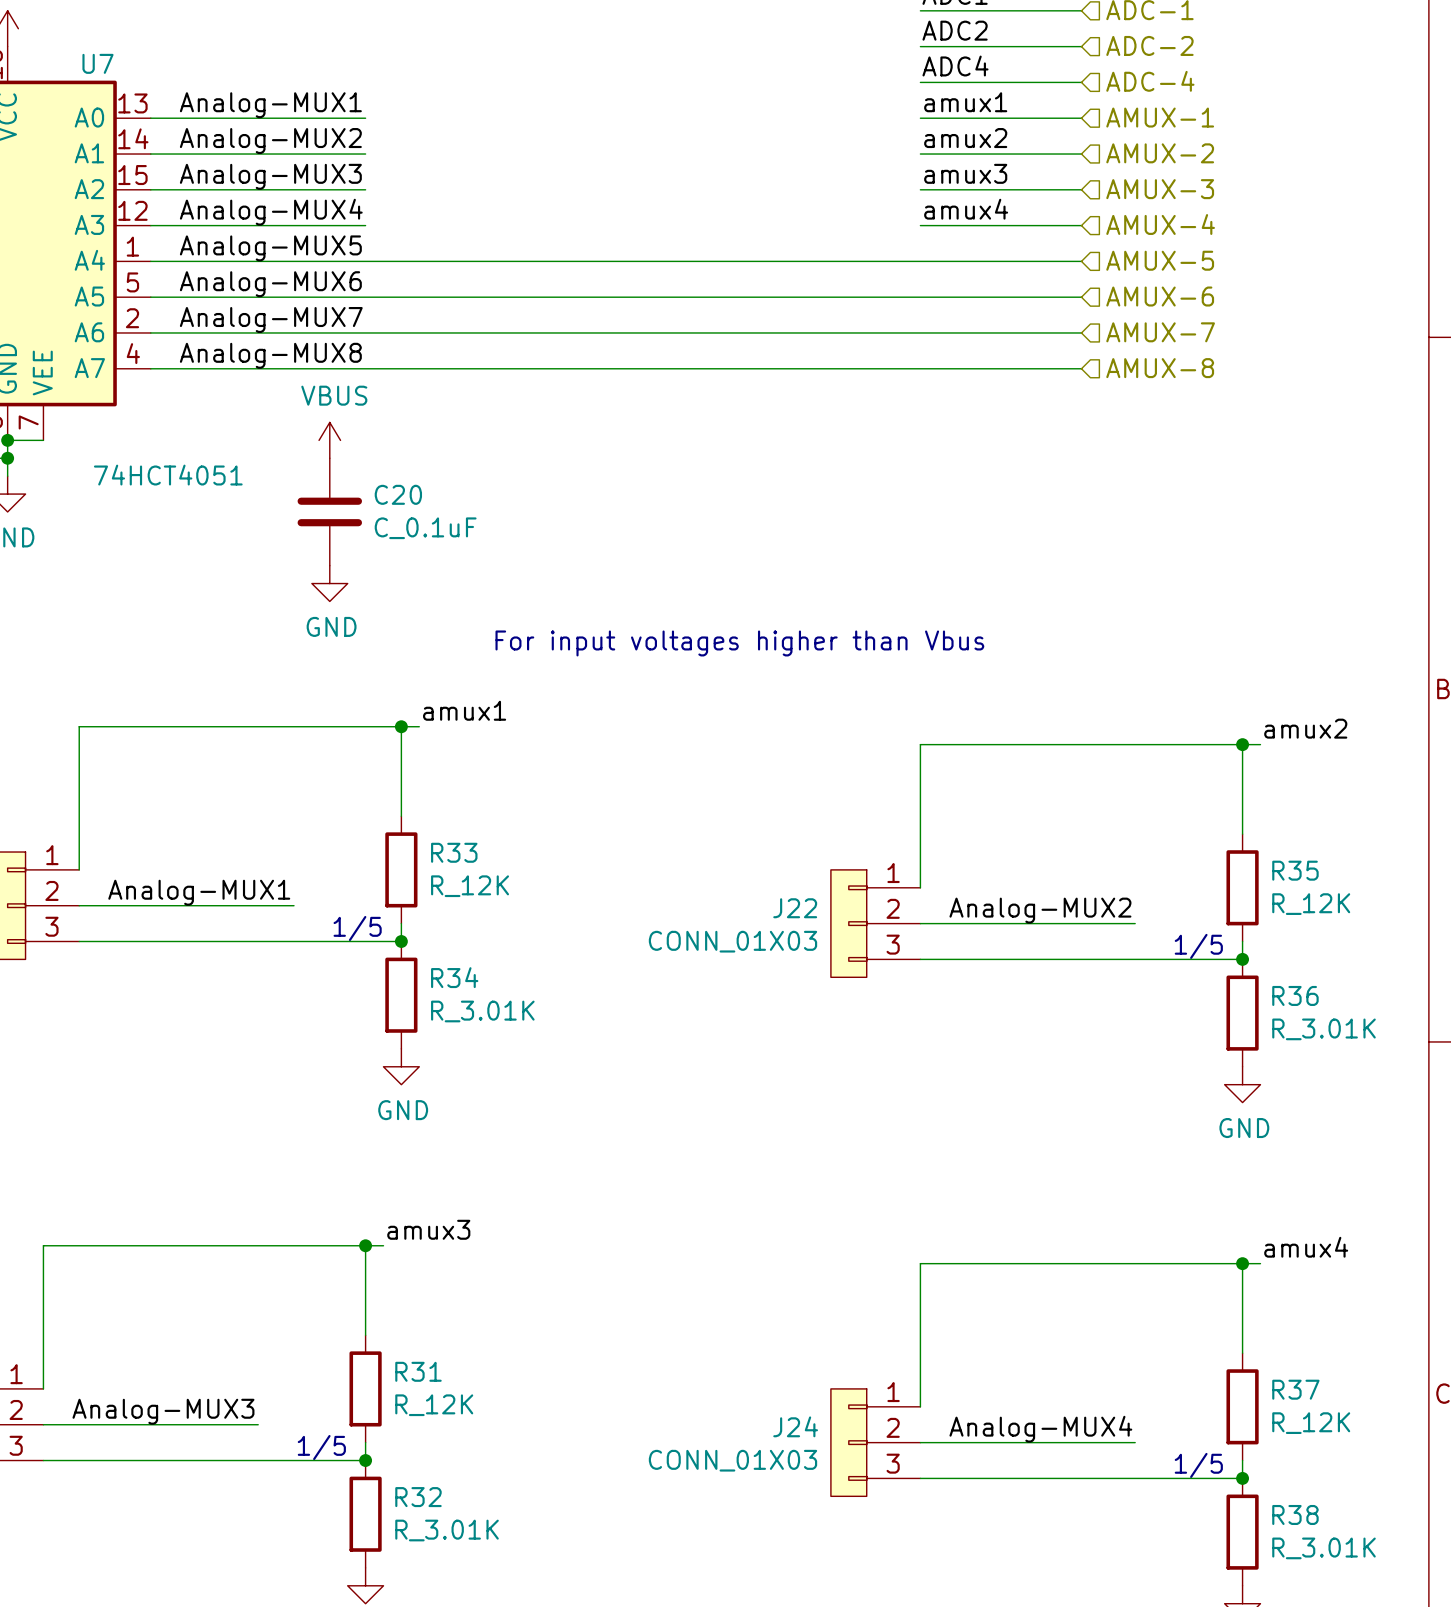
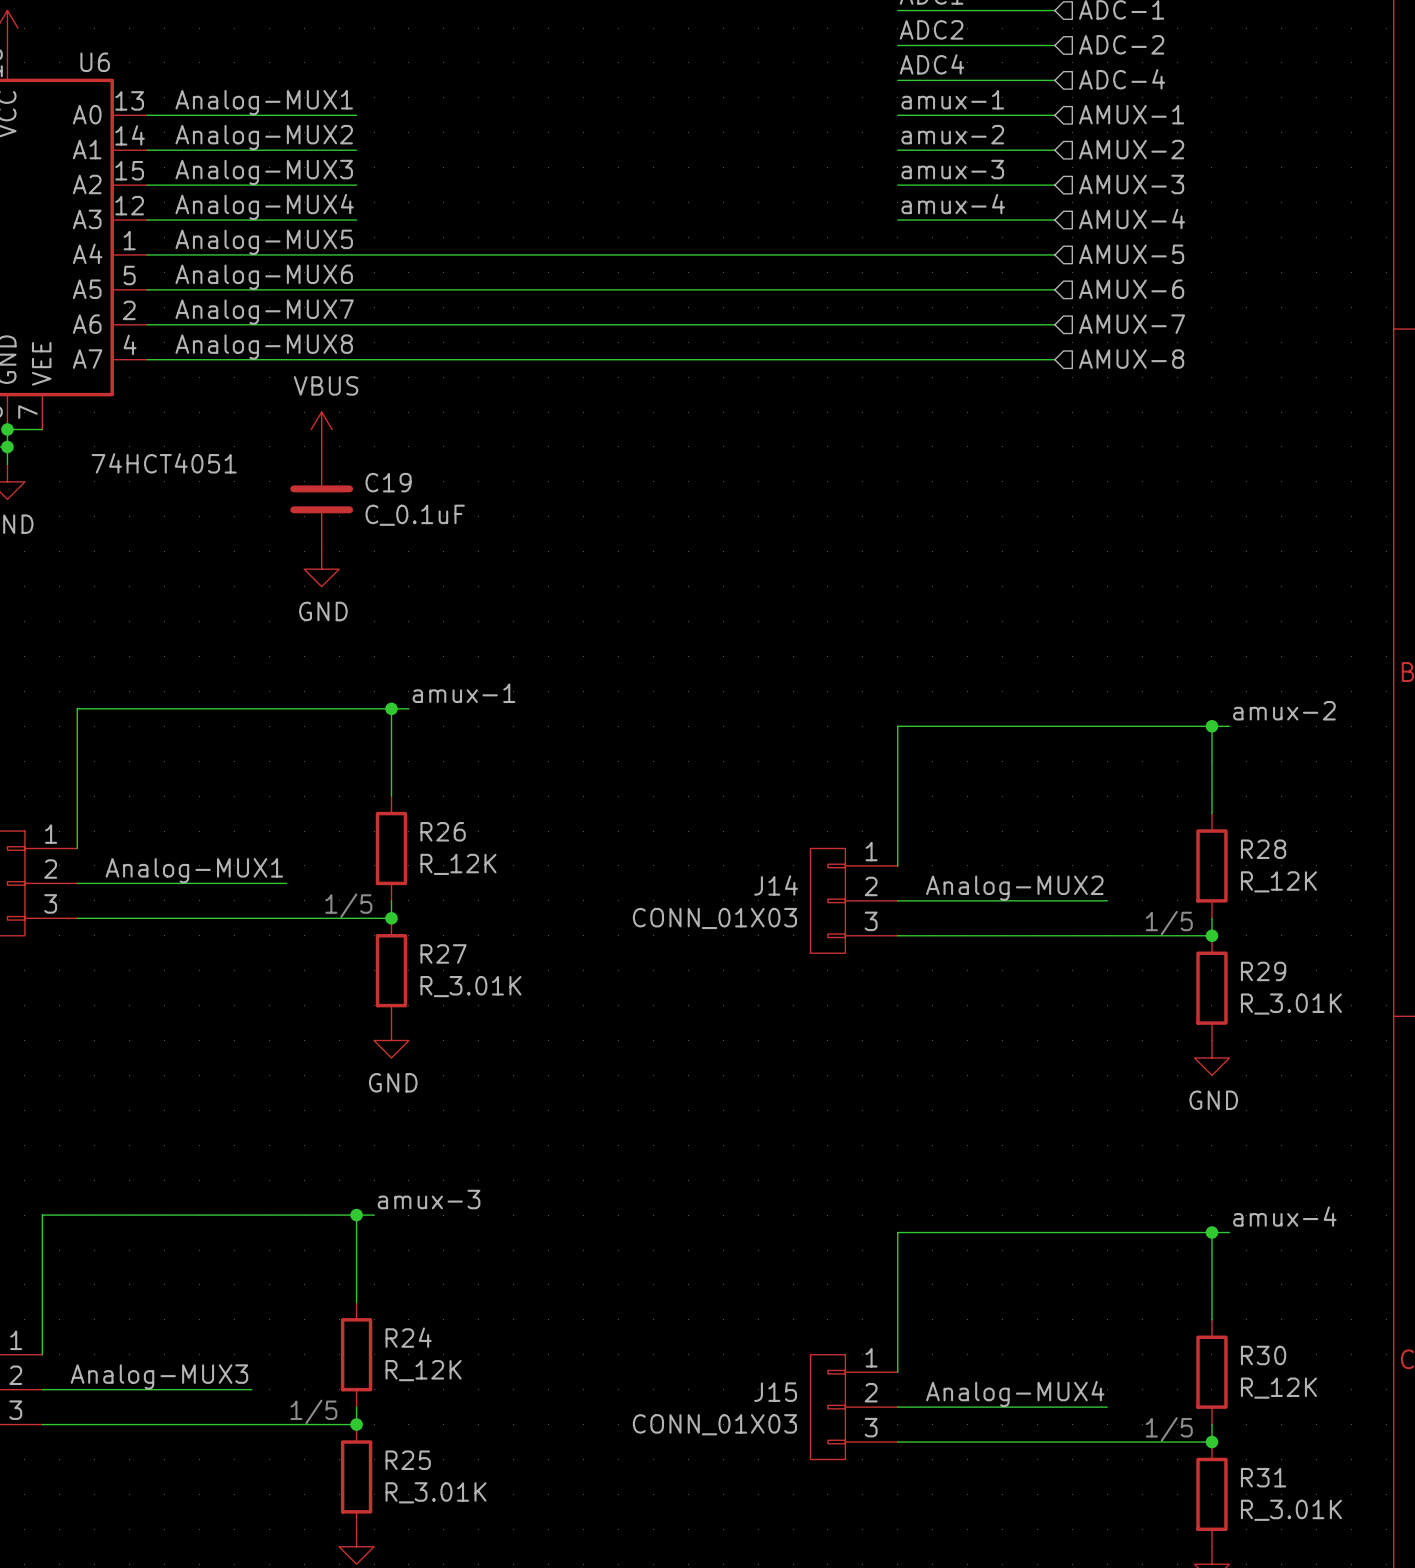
U7 name: U7 (97, 63) -> U6 (95, 62)
label: amux1 (965, 102) -> amux-1 (952, 99)
label: amux2 (965, 138) -> amux-2 (952, 134)
label: amux3 (965, 173) -> amux-3 (952, 169)
label: amux4 (966, 209) -> amux-4 (953, 204)
C20 name: C20 (398, 494) -> C19 (388, 482)
text: For input voltages higher than Vbus (739, 643) -> none
label: amux1 (464, 710) -> amux-1 (463, 693)
label: amux2 (1305, 728) -> amux-2 (1284, 710)
R33 name: R33 (454, 852) -> R26 (443, 831)
R35 name: R35 (1295, 870) -> R28 (1263, 849)
J22 name: J22 (795, 908) -> J14 (776, 885)
R34 name: R34 (454, 977) -> R27 (443, 953)
R36 name: R36 (1295, 995) -> R29 (1263, 971)
label: amux3 (428, 1229) -> amux-3 (429, 1199)
label: amux4 (1306, 1247) -> amux-4 (1284, 1216)
R31 name: R31 (418, 1371) -> R24 (408, 1337)
R37 name: R37 (1295, 1389) -> R30 (1263, 1355)
J24 name: J24 (795, 1426) -> J15 (775, 1392)
R32 name: R32 (418, 1497) -> R25 (408, 1460)
R38 name: R38 (1295, 1514) -> R31 (1263, 1477)

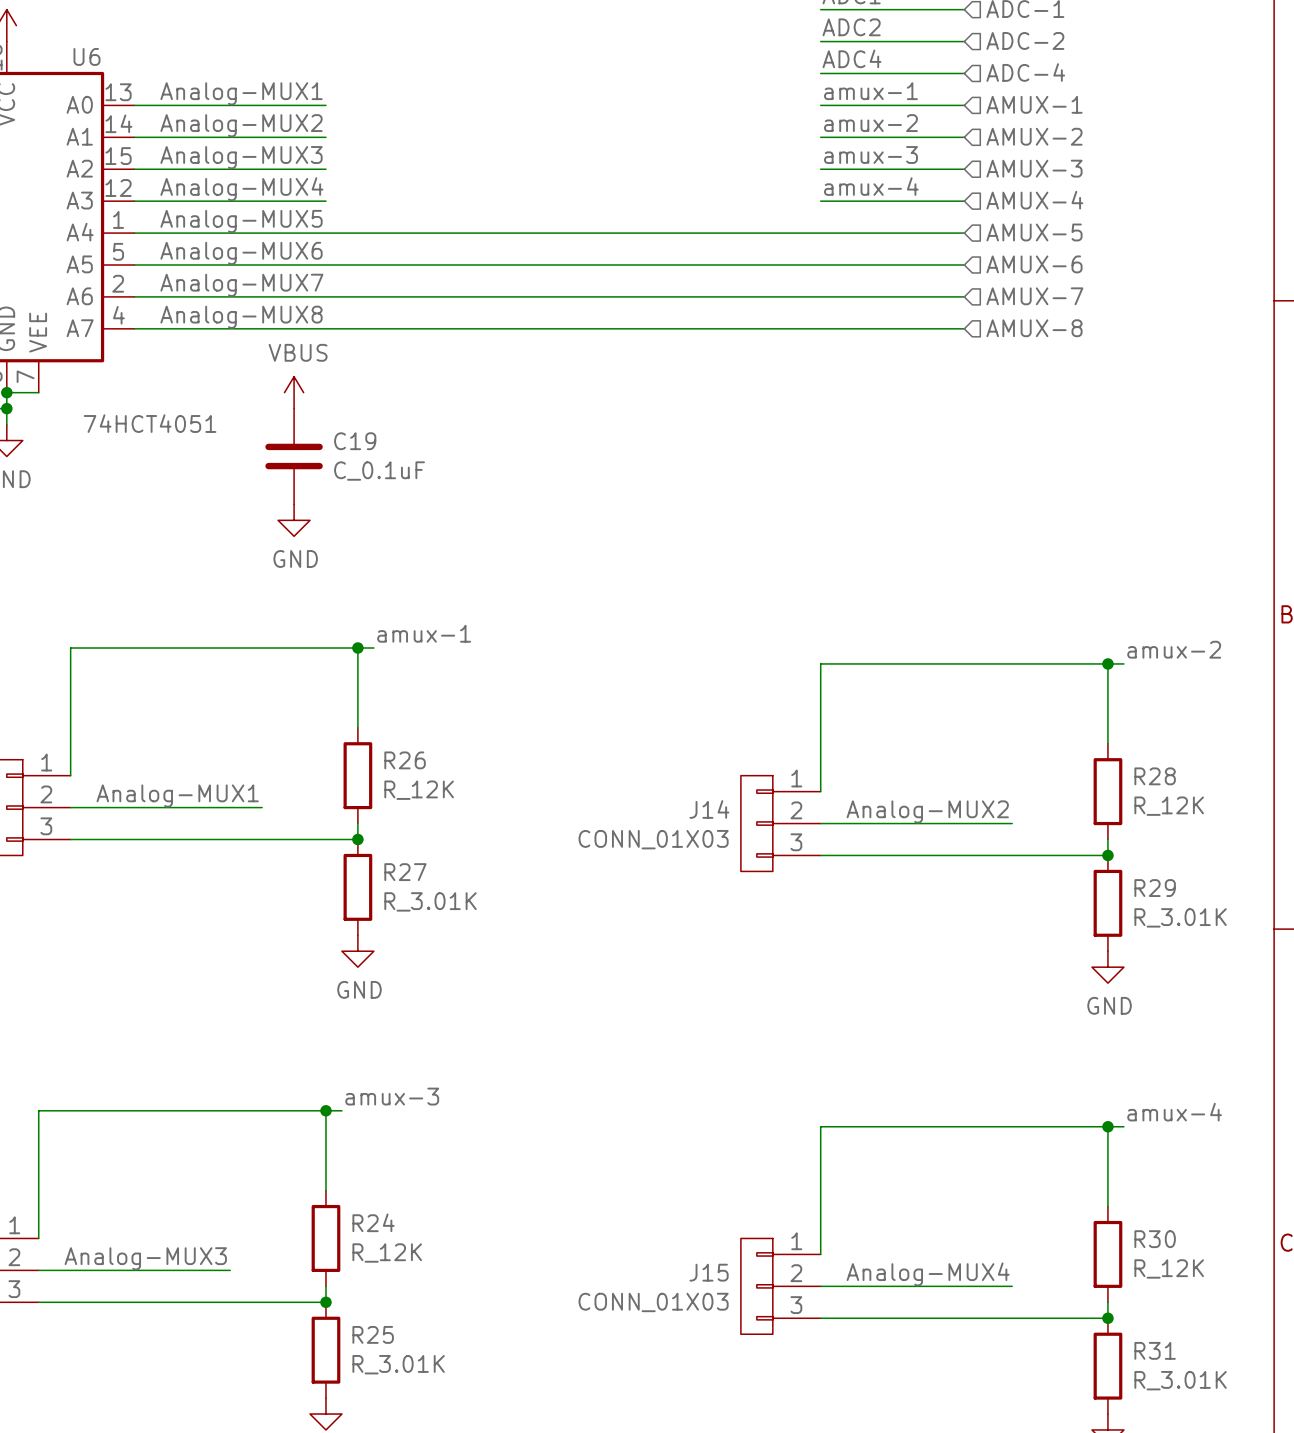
text: 1/5 (348, 905) -> none
text: 1/5 (1169, 923) -> none
text: 1/5 (313, 1411) -> none
text: 1/5 (1169, 1429) -> none

